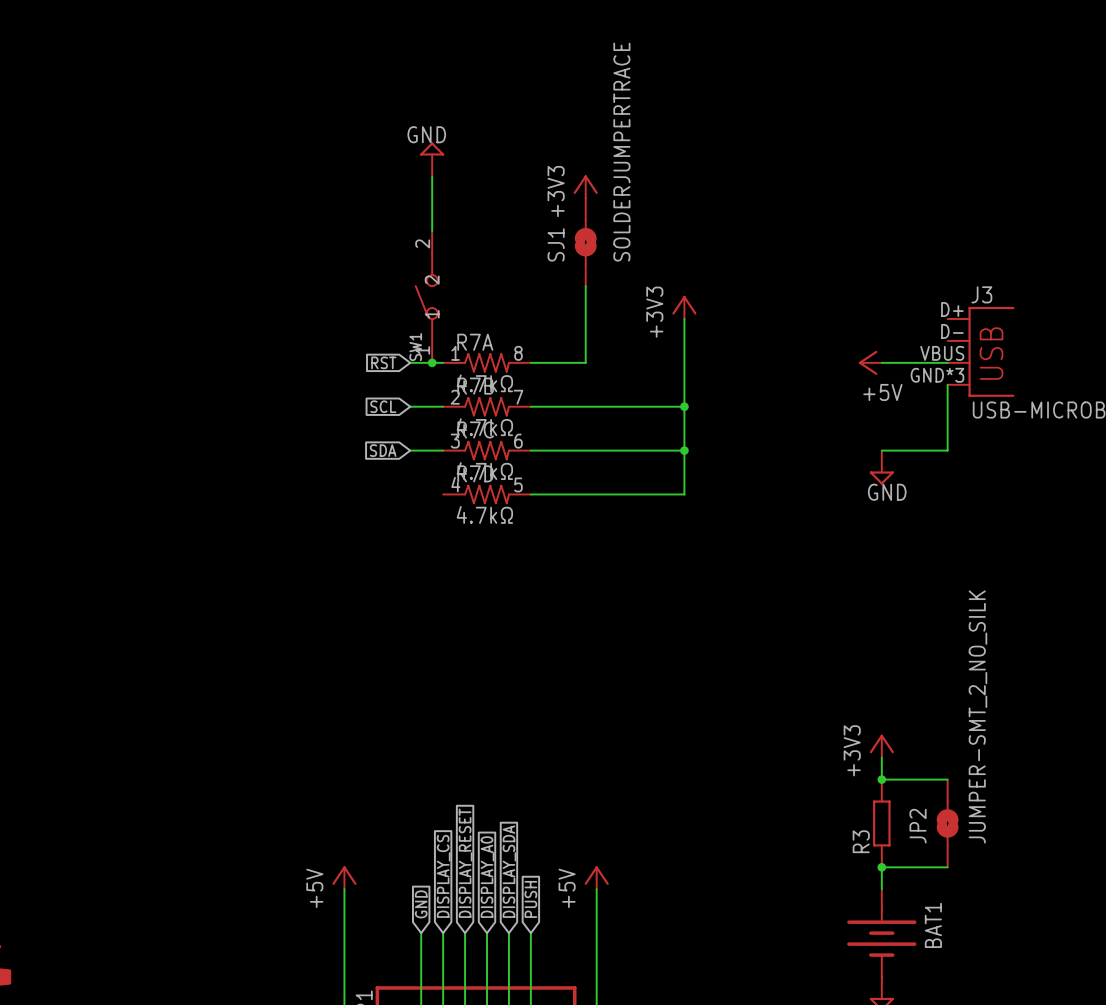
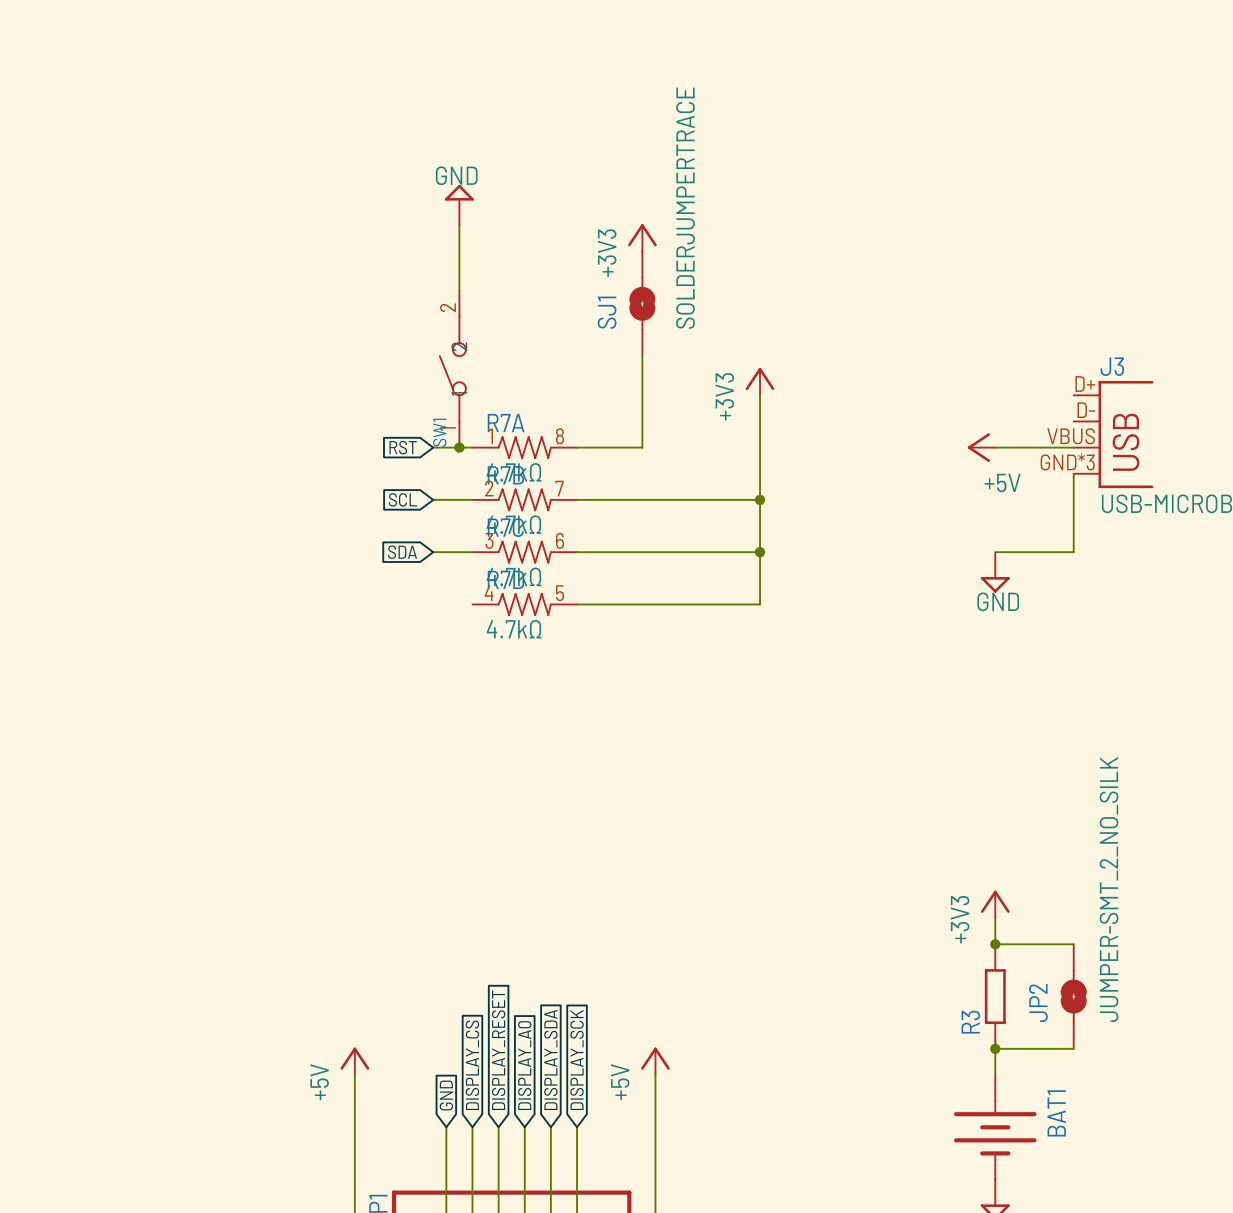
global label: PUSH (530, 899) -> DISPLAY_SCK (577, 1059)

